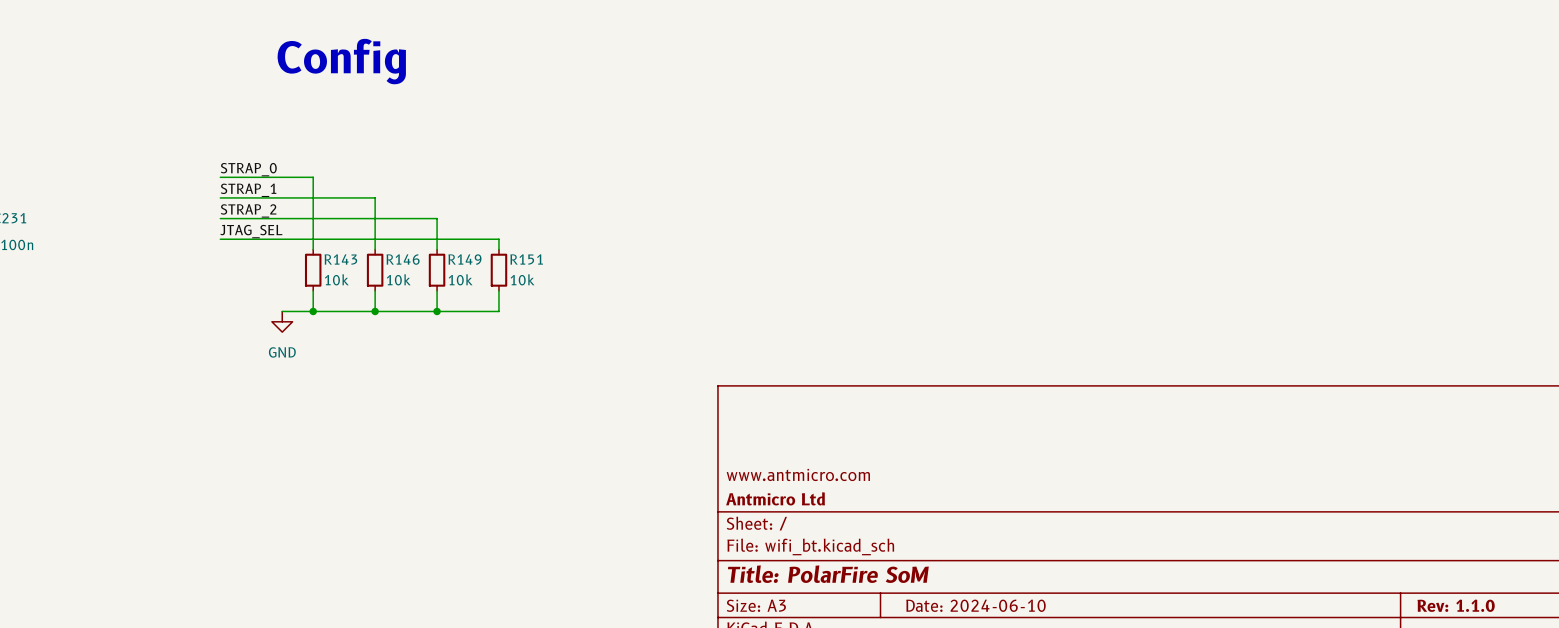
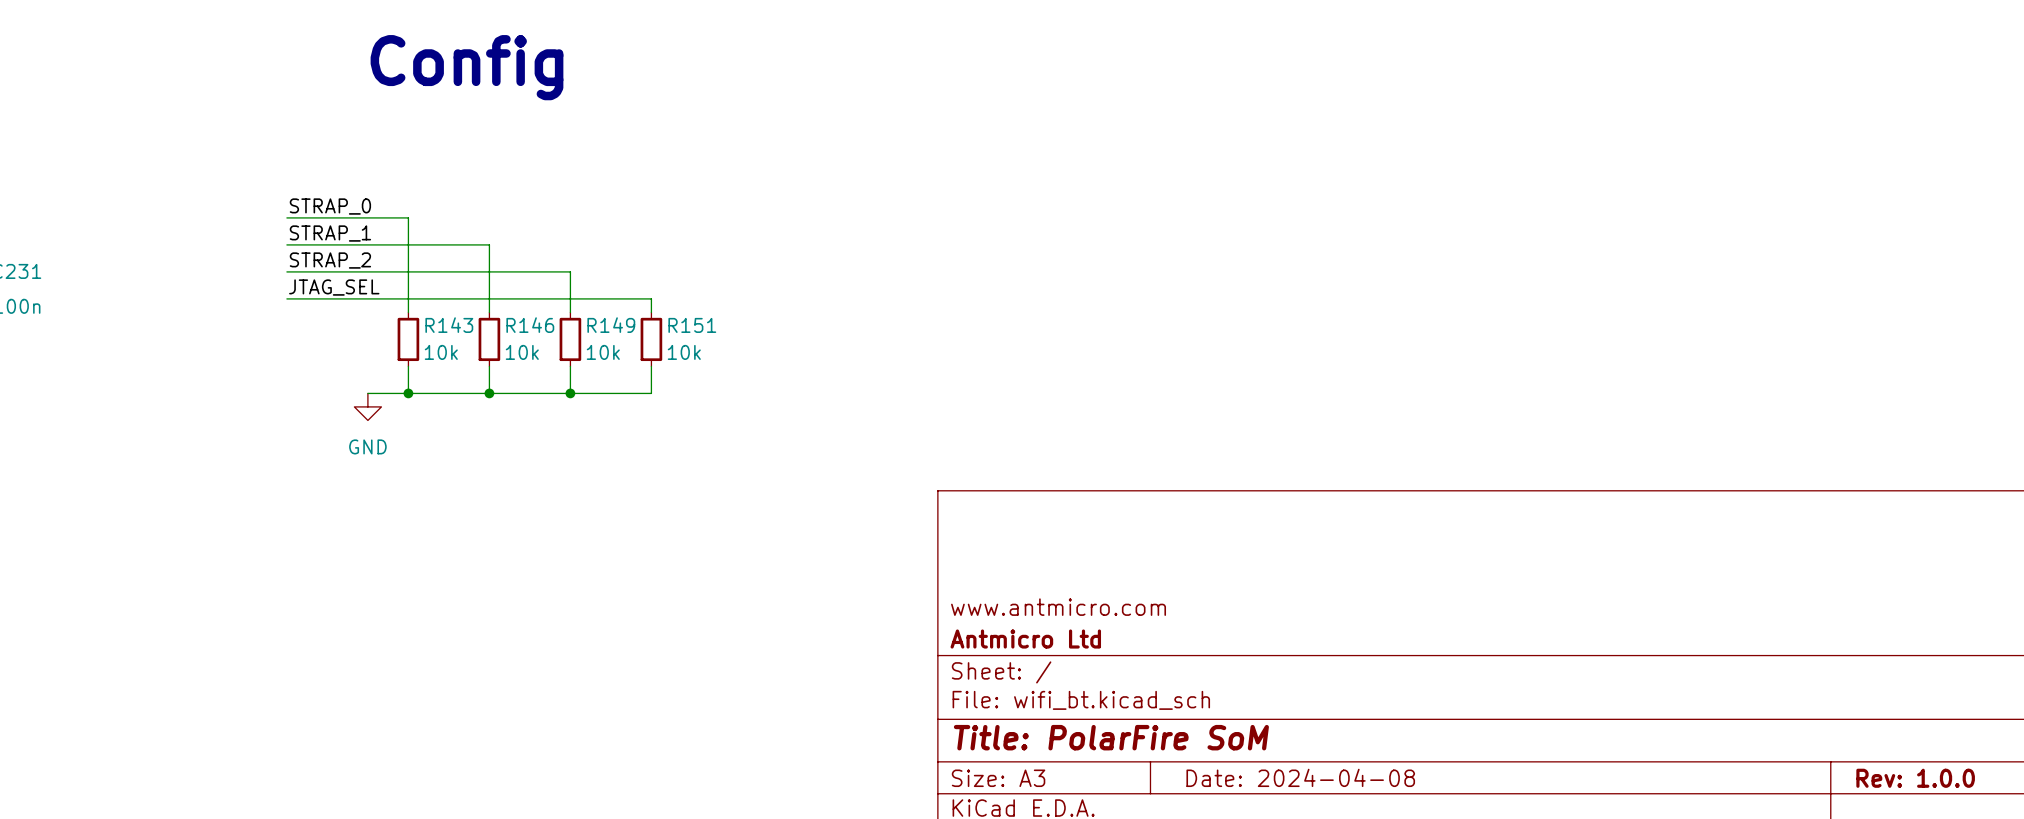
title block: Date: 2024-06-10 (975, 605) -> Date: 2024-04-08 (1300, 777)
title block: Rev: 1.1.0 (1456, 605) -> Rev: 1.0.0 (1915, 778)

